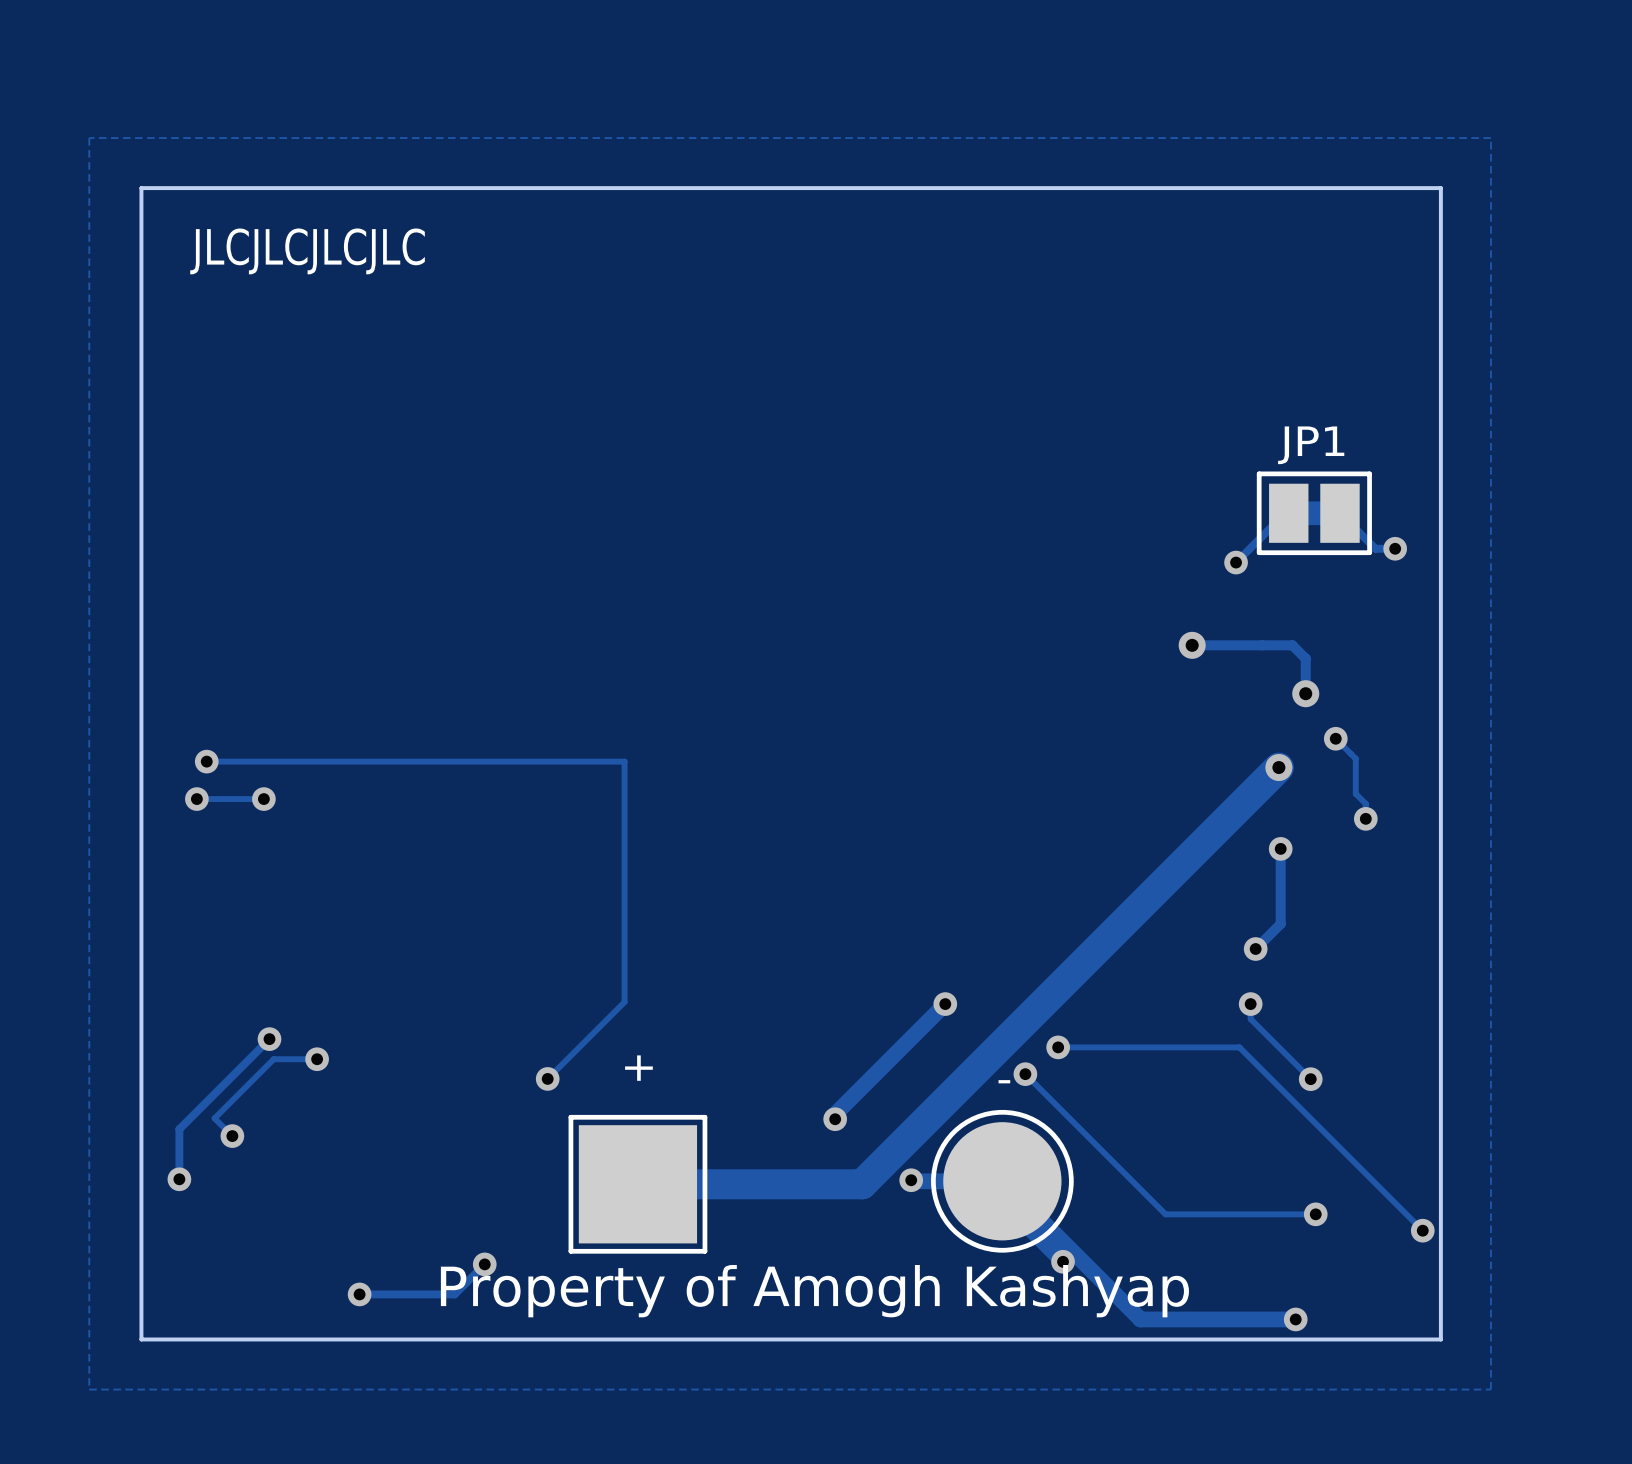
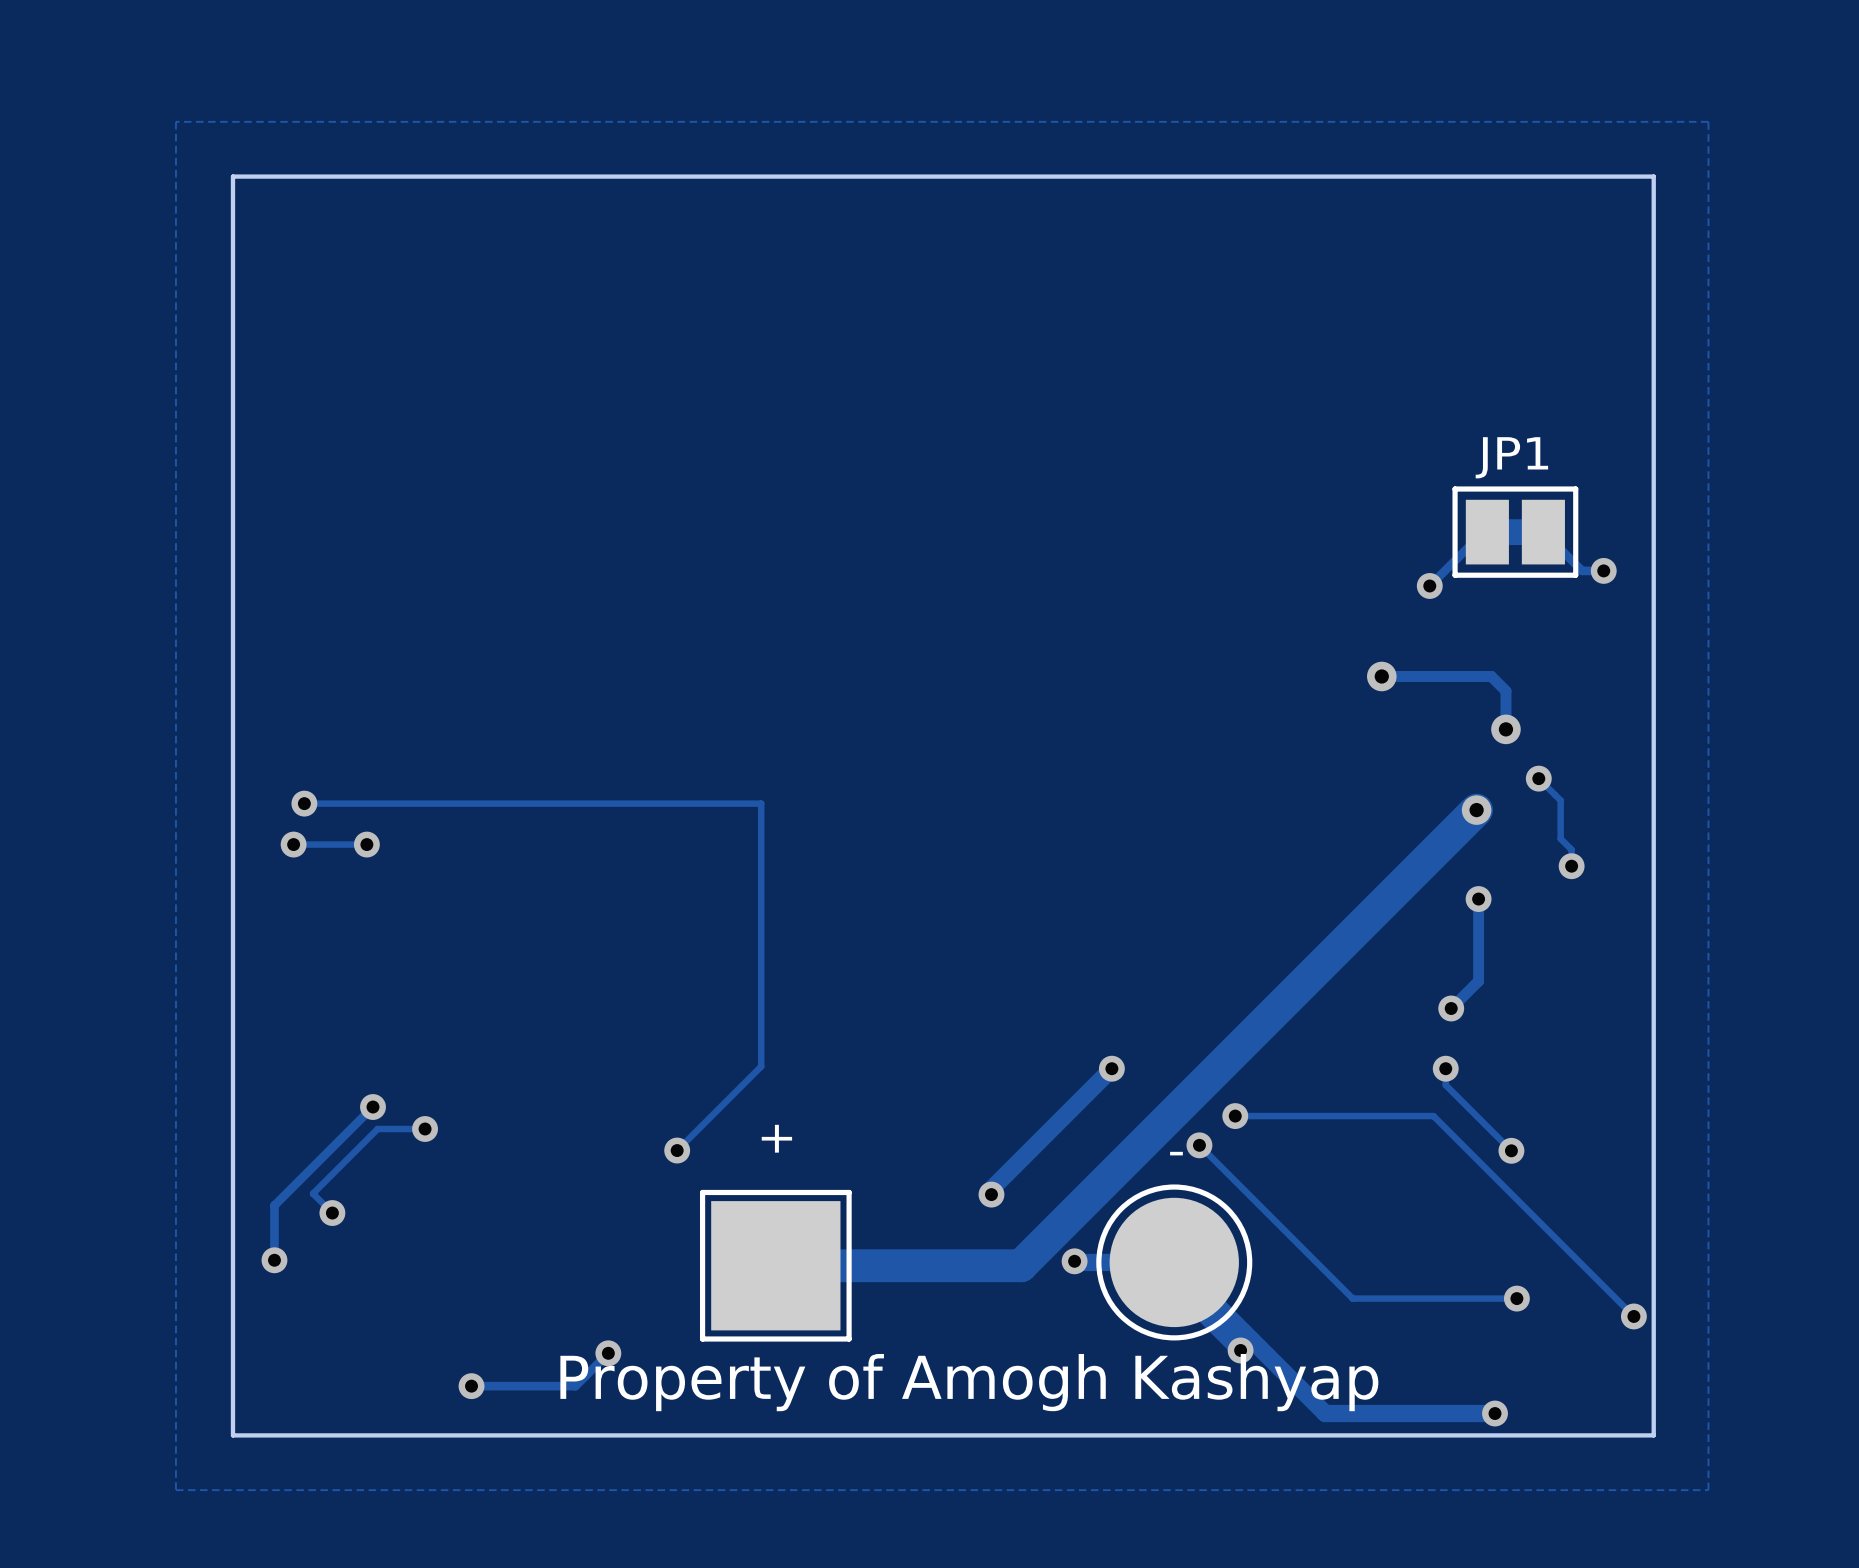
text: JLCJLCJLCJLC (307, 251) -> none

